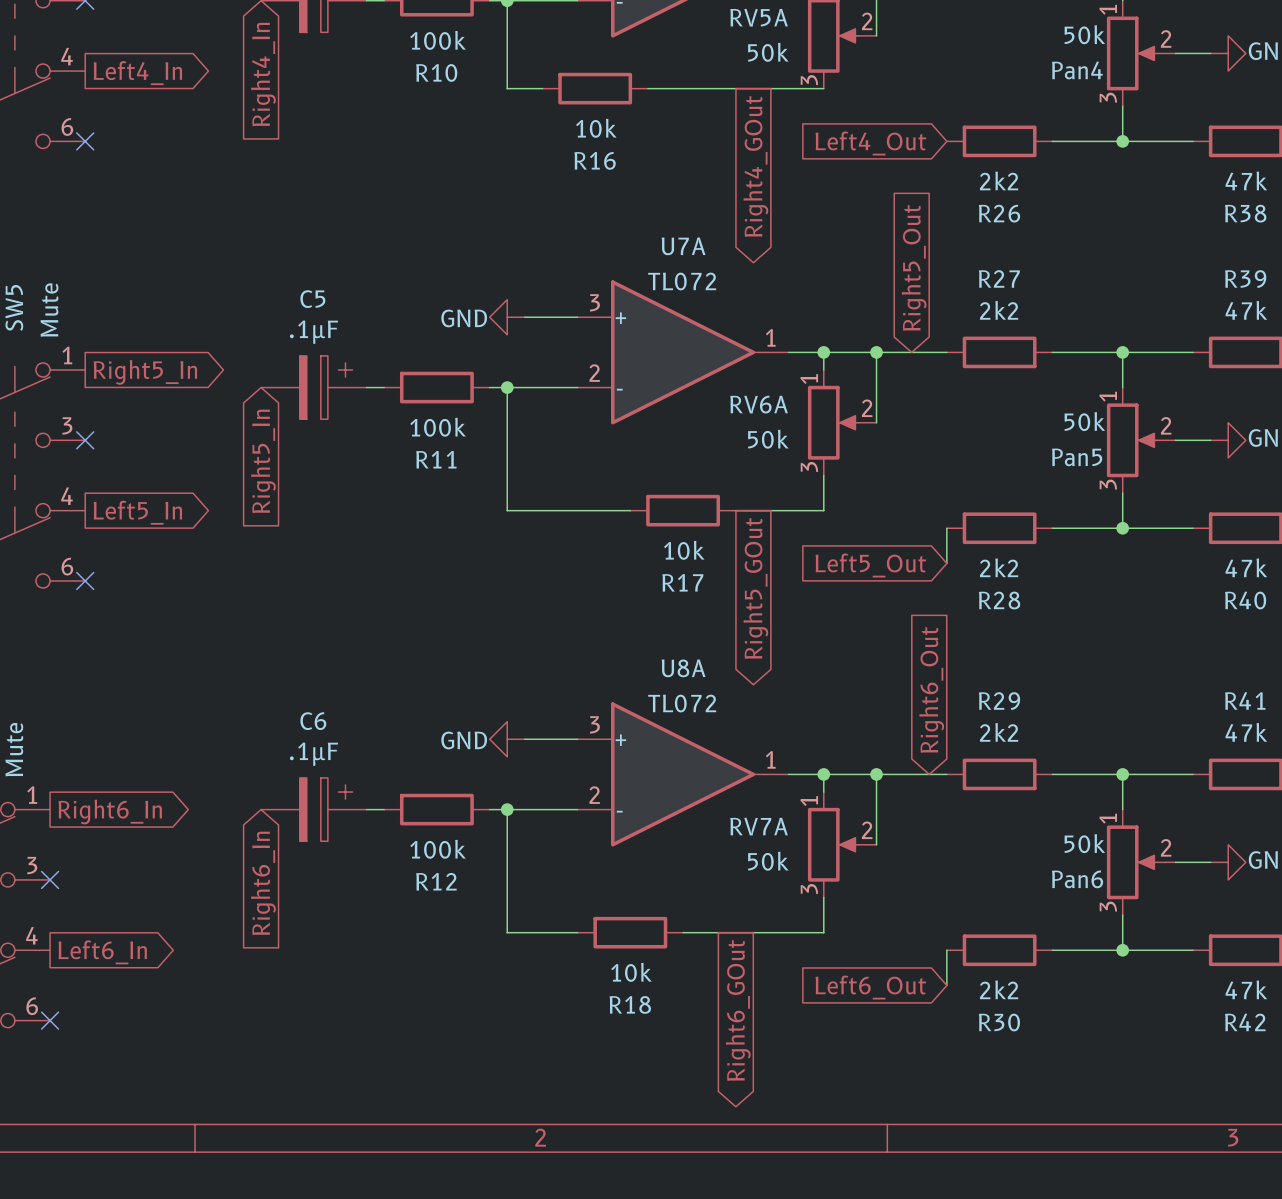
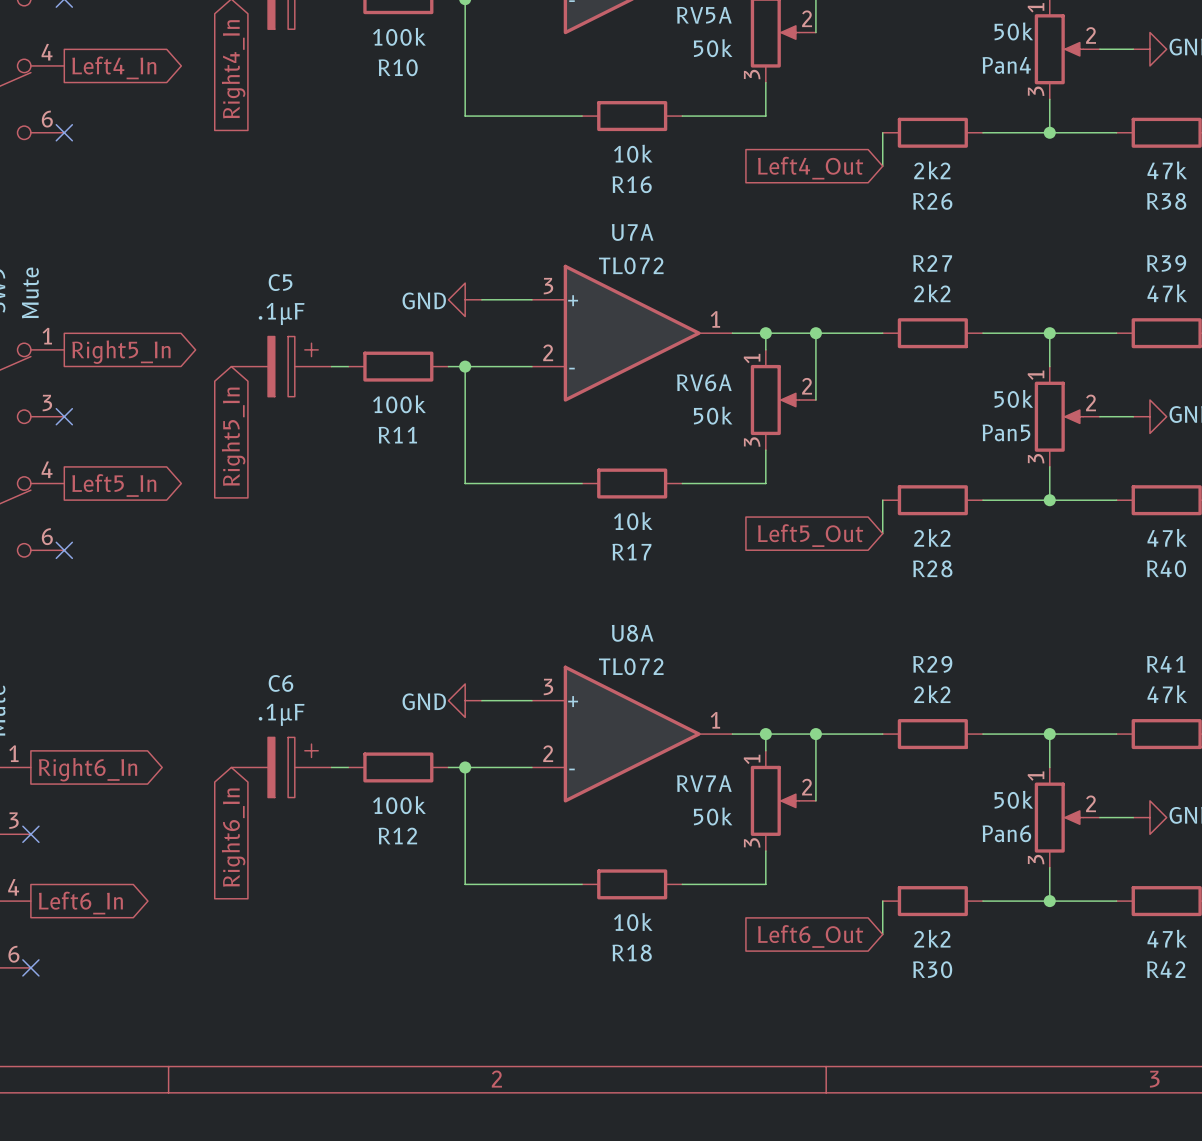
wire: (507, 88) (542, 88) -> (465, 82) (465, 116) (582, 116)
R16 position: (595, 88) -> (632, 116)
wire: (647, 88) (823, 88) -> (682, 116) (765, 116) (765, 82)
wire: none -> (882, 132) (882, 166)
global label position: Left4_Out (870, 143) -> Left4_Out (810, 168)
global label: Right4_GOut (755, 166) -> none
global label: Right5_Out (914, 267) -> none
global label: Right5_GOut (755, 588) -> none
global label: Right6_Out (931, 689) -> none
R18 position: (630, 932) -> (632, 884)
wire: (683, 932) (735, 932) -> (531, 884) (582, 884)
global label: Right6_GOut (738, 1010) -> none

